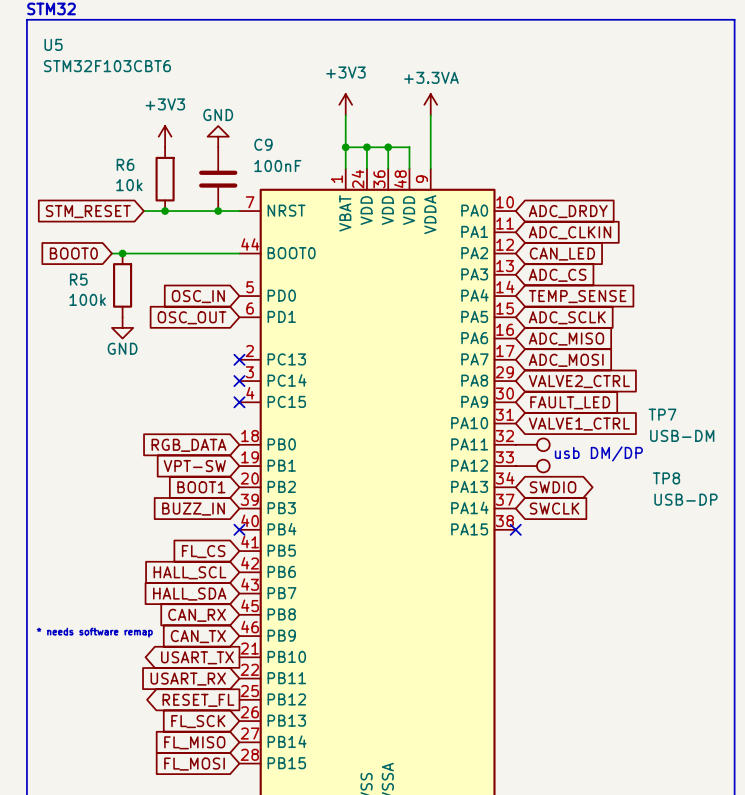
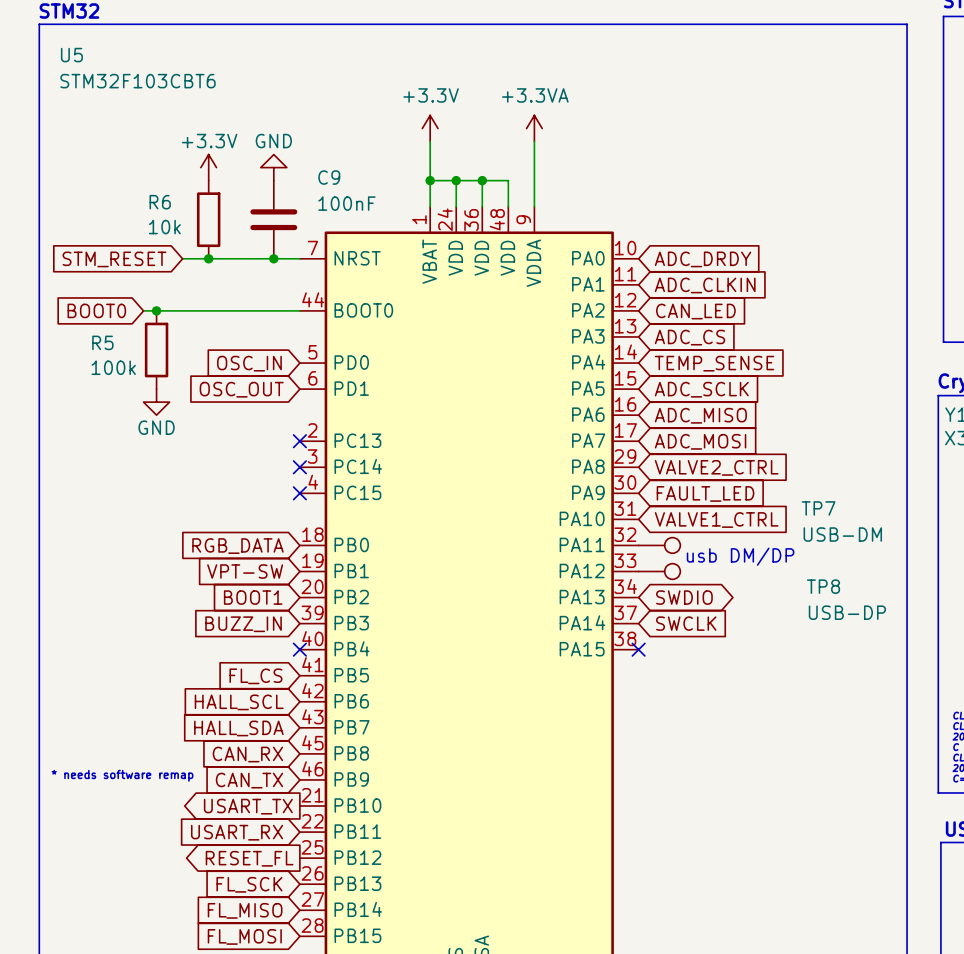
power symbol: +3V3 (345, 104) -> +3.3V (430, 128)
power symbol: +3V3 (165, 136) -> +3.3V (208, 167)

